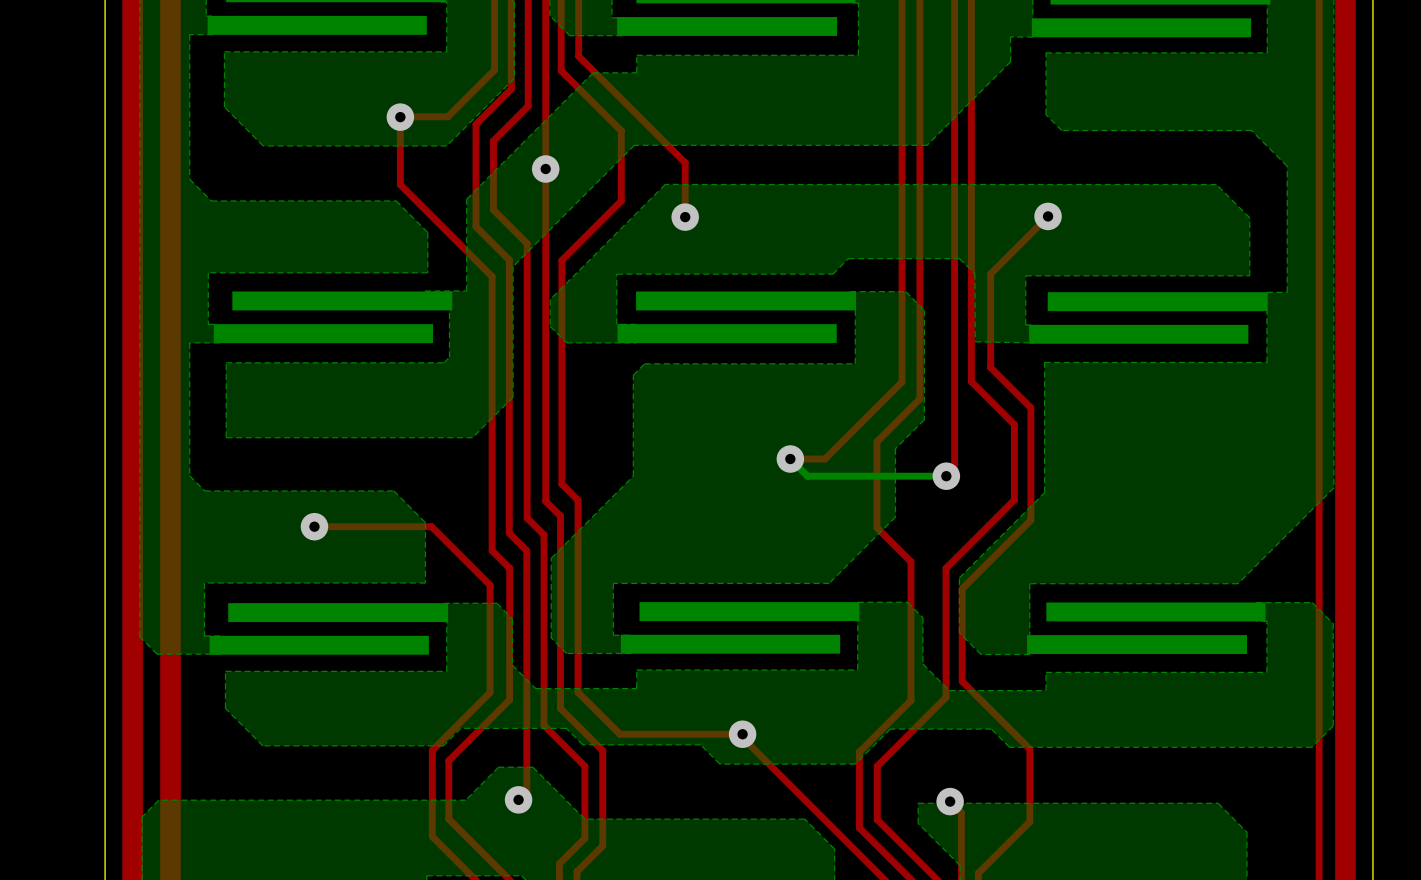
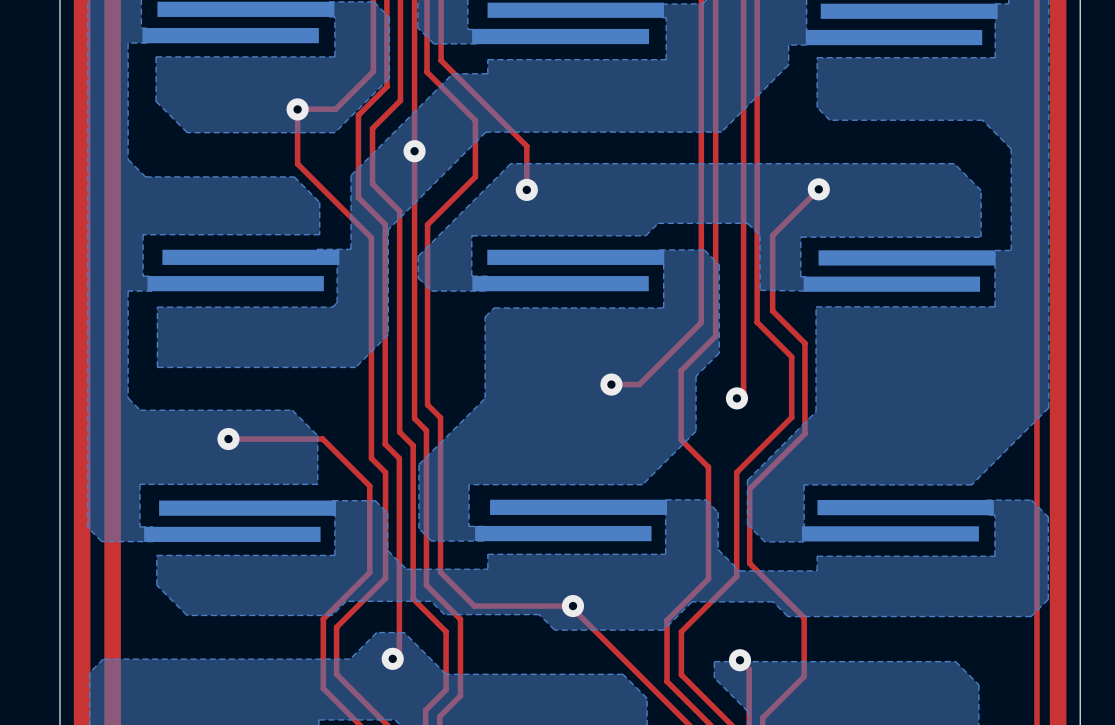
bottom track: (790, 459) (807, 476) (946, 476) -> none

